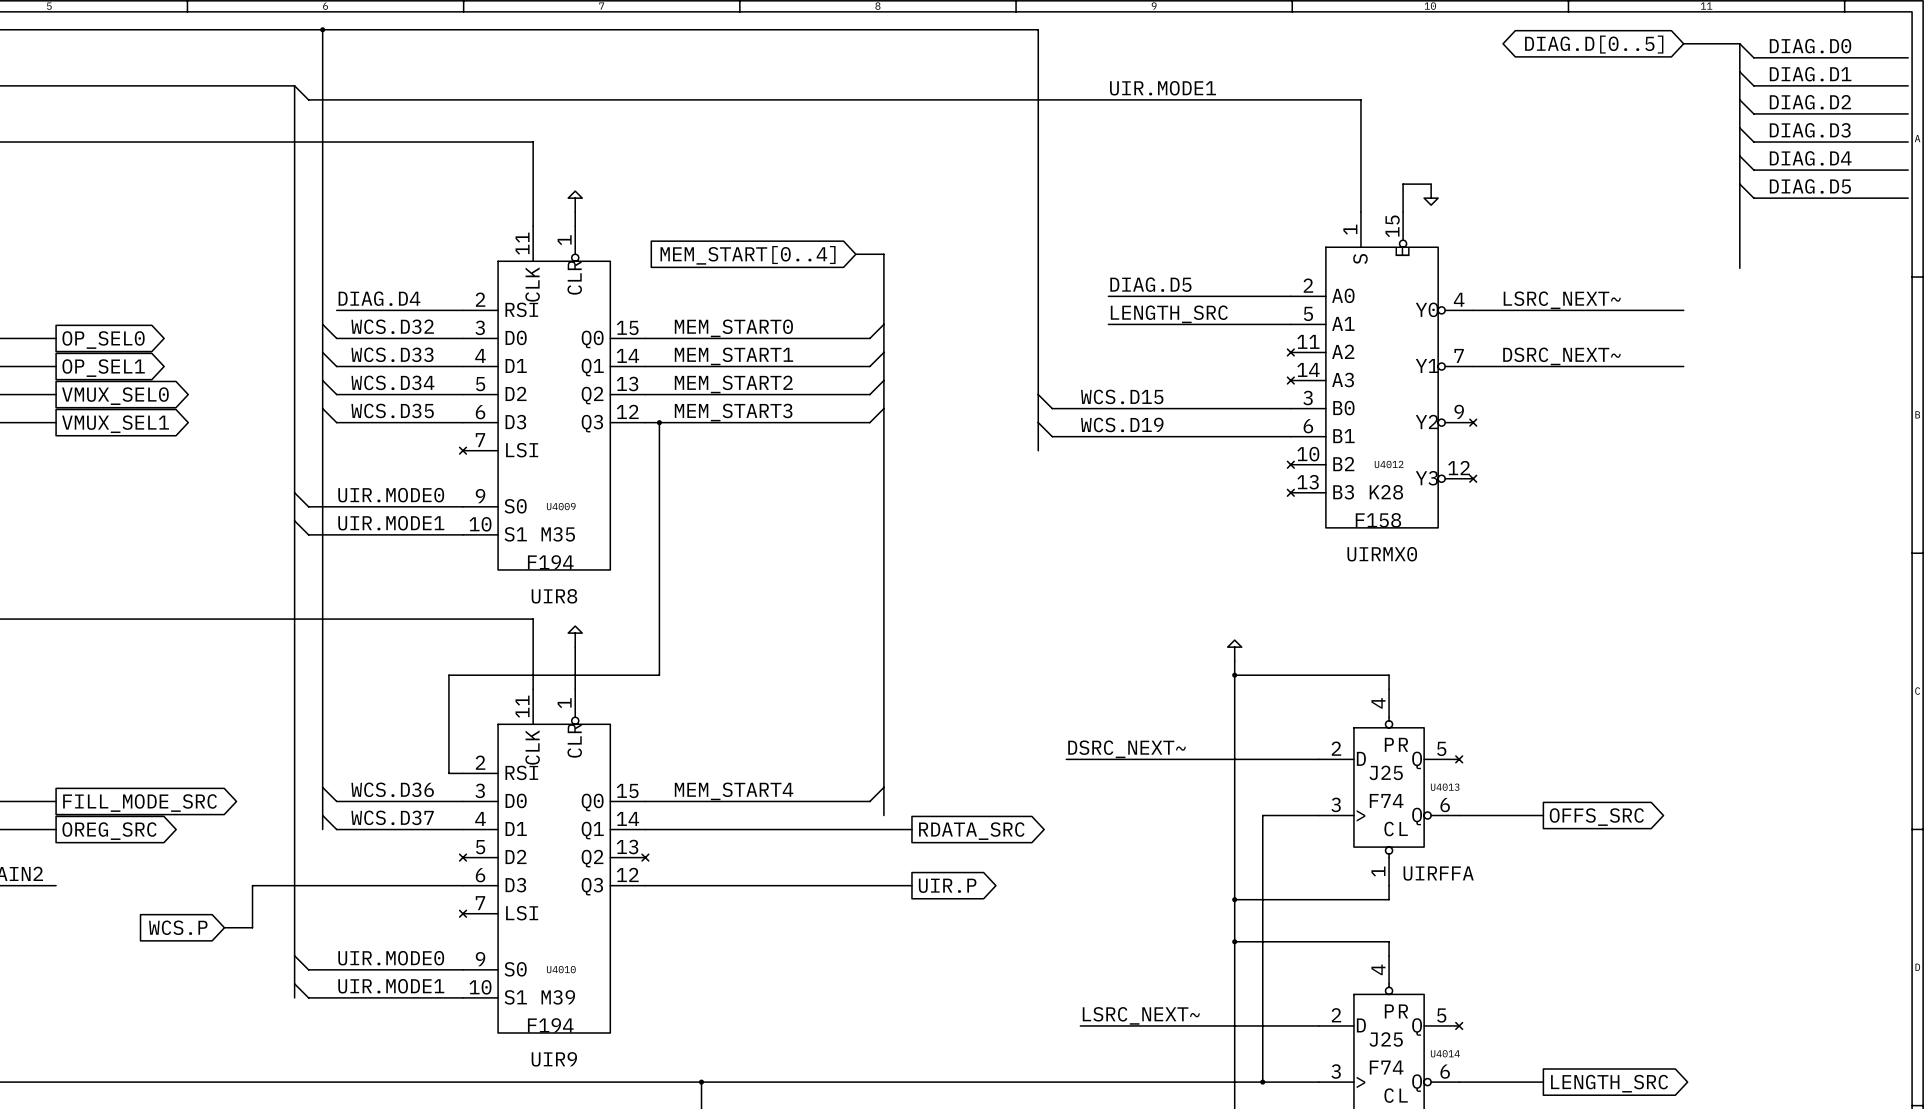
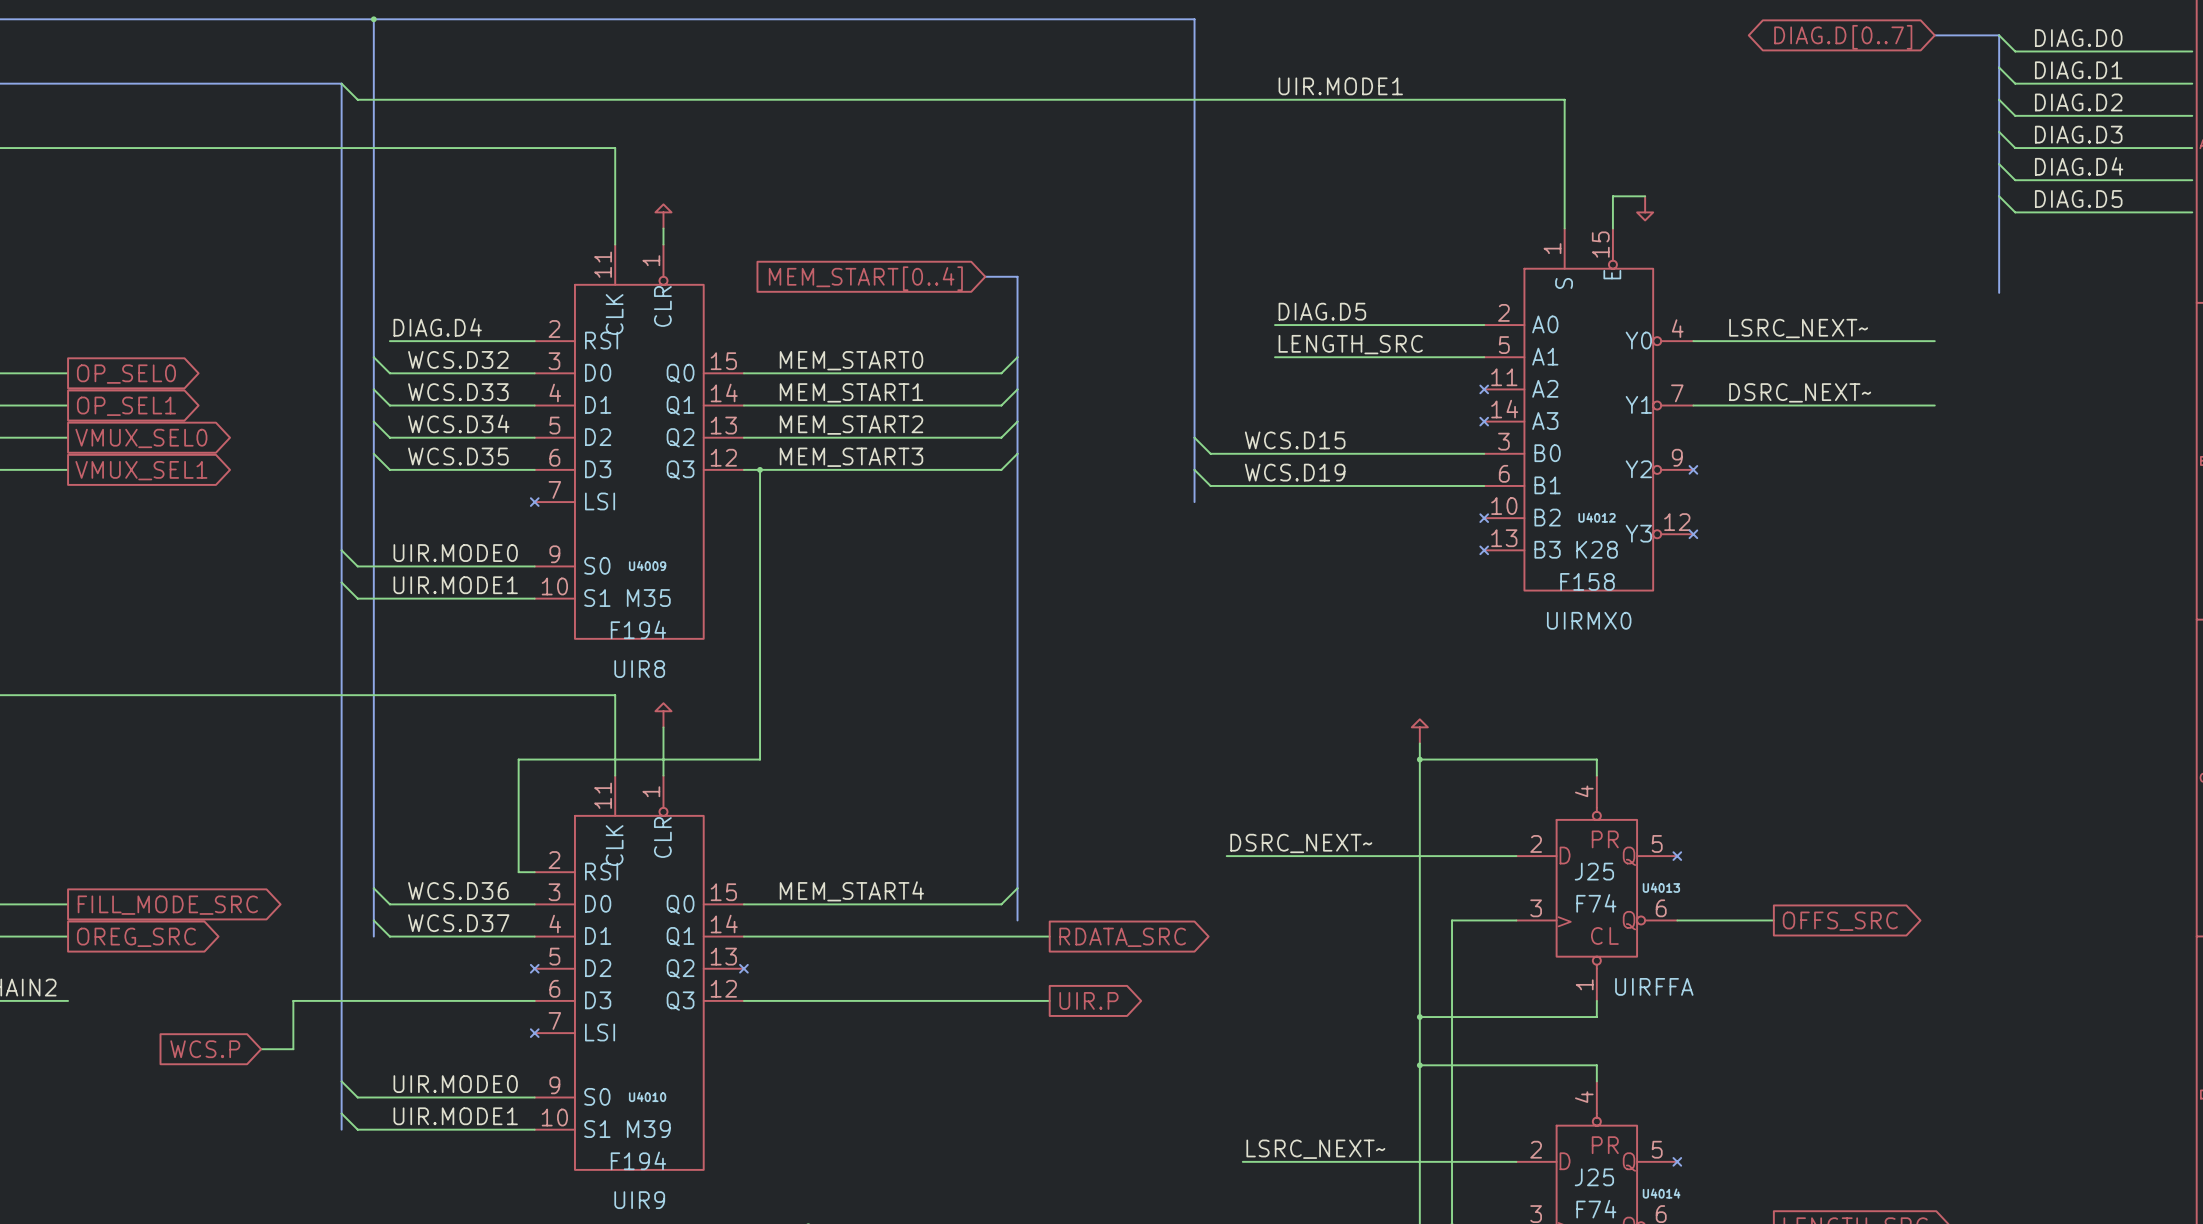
global label: DIAG.D[0..5] (1594, 44) -> DIAG.D[0..7] (1843, 37)

